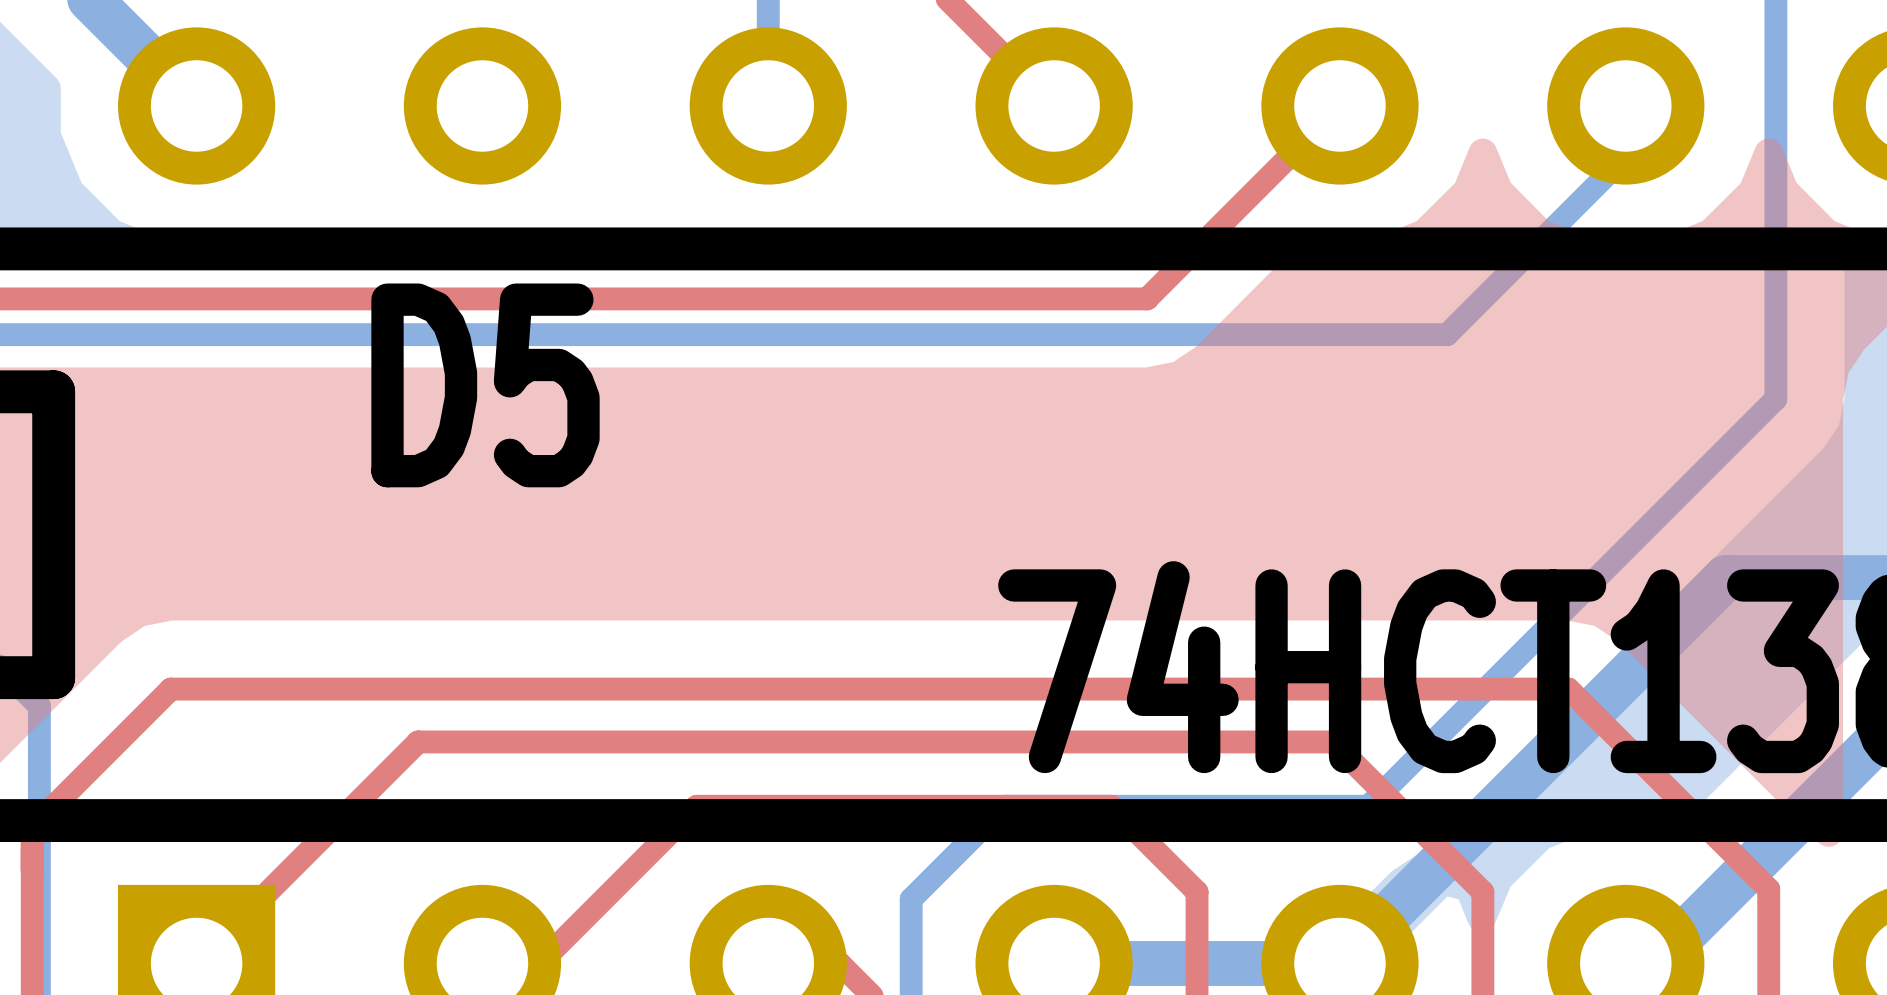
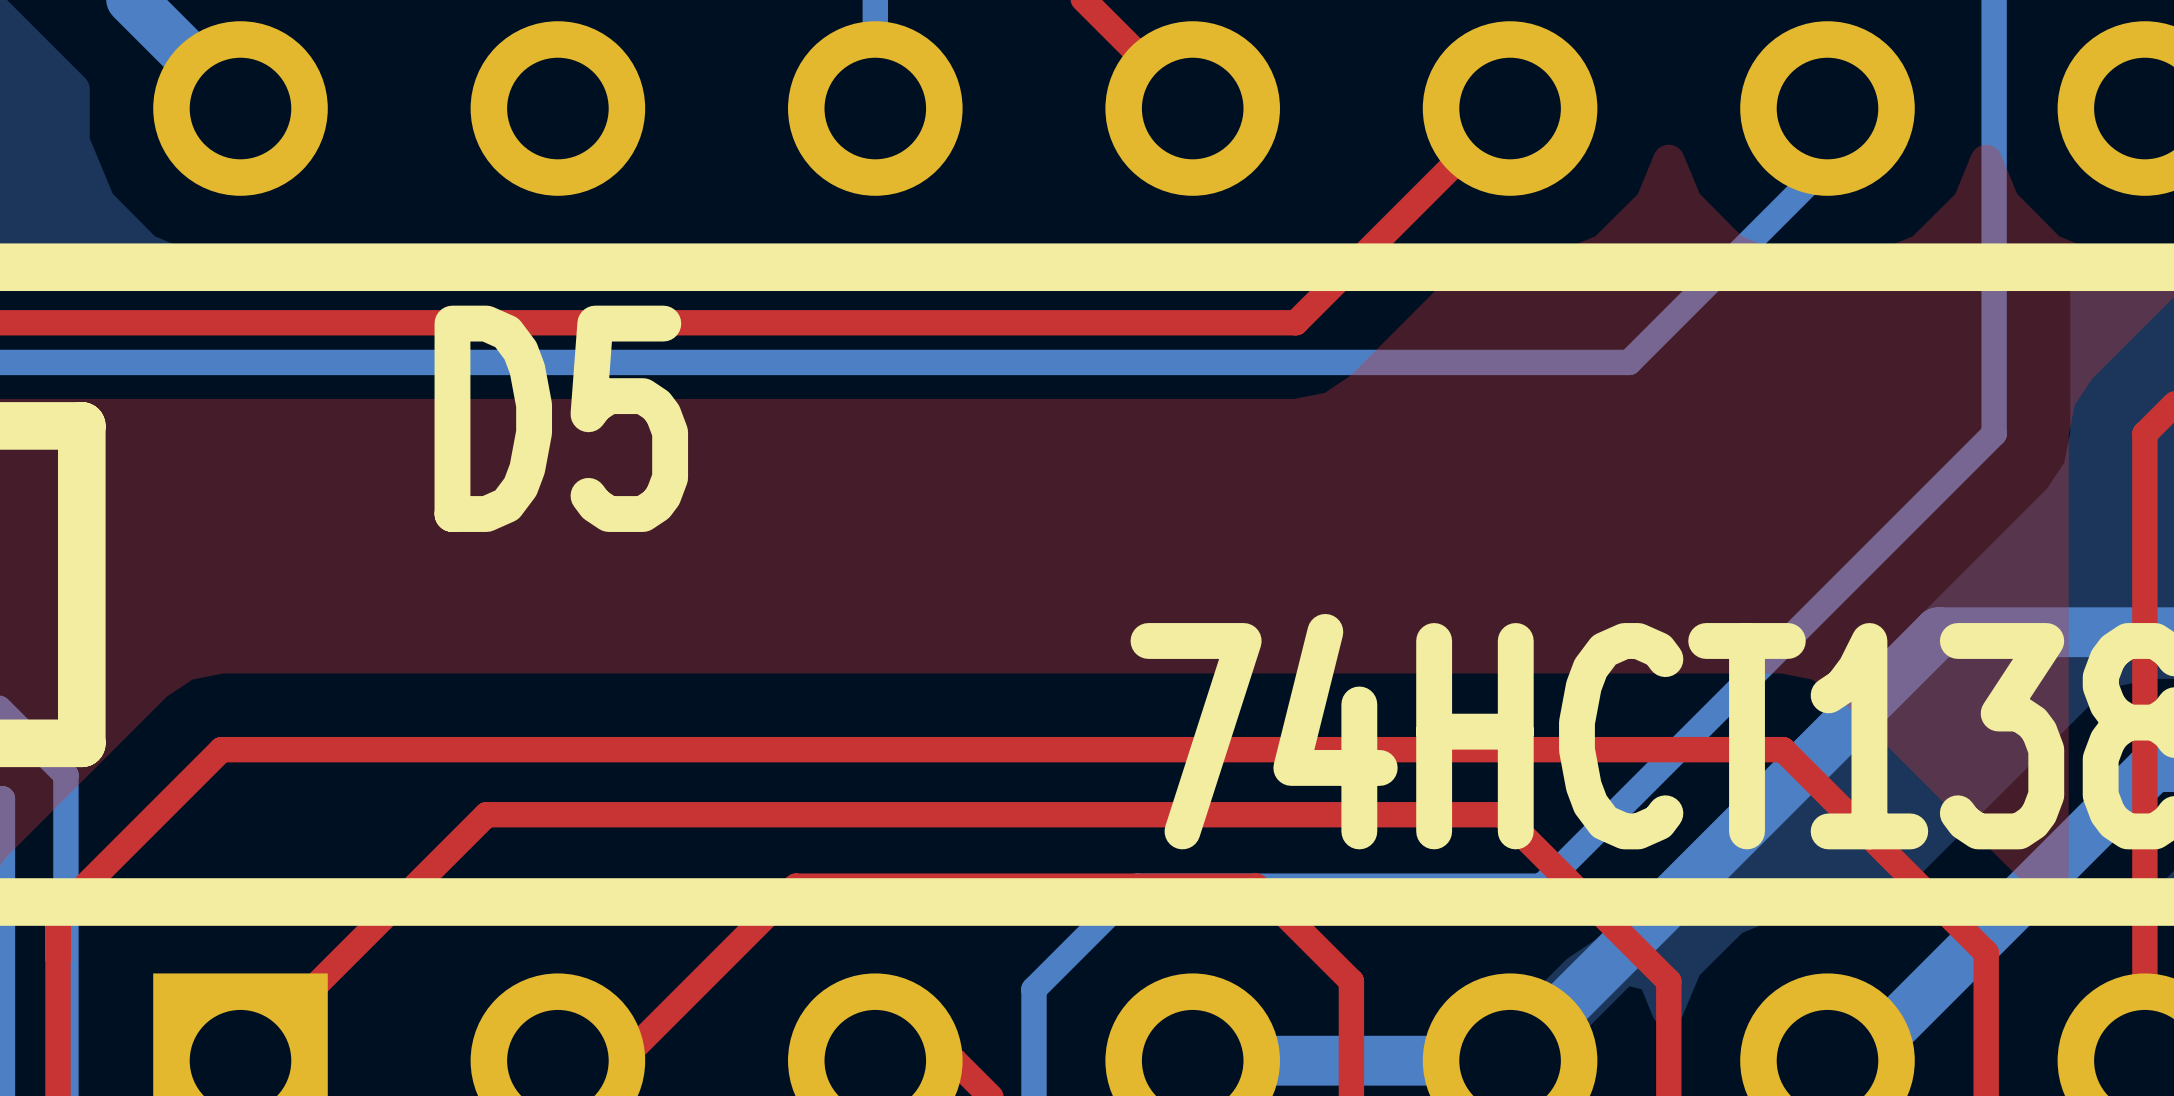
top track: (32, 830) (32, 827) (170, 689) (1568, 689) (1768, 889) -> (58, 913) (221, 749) (1783, 749) (1986, 952) (1986, 978)

